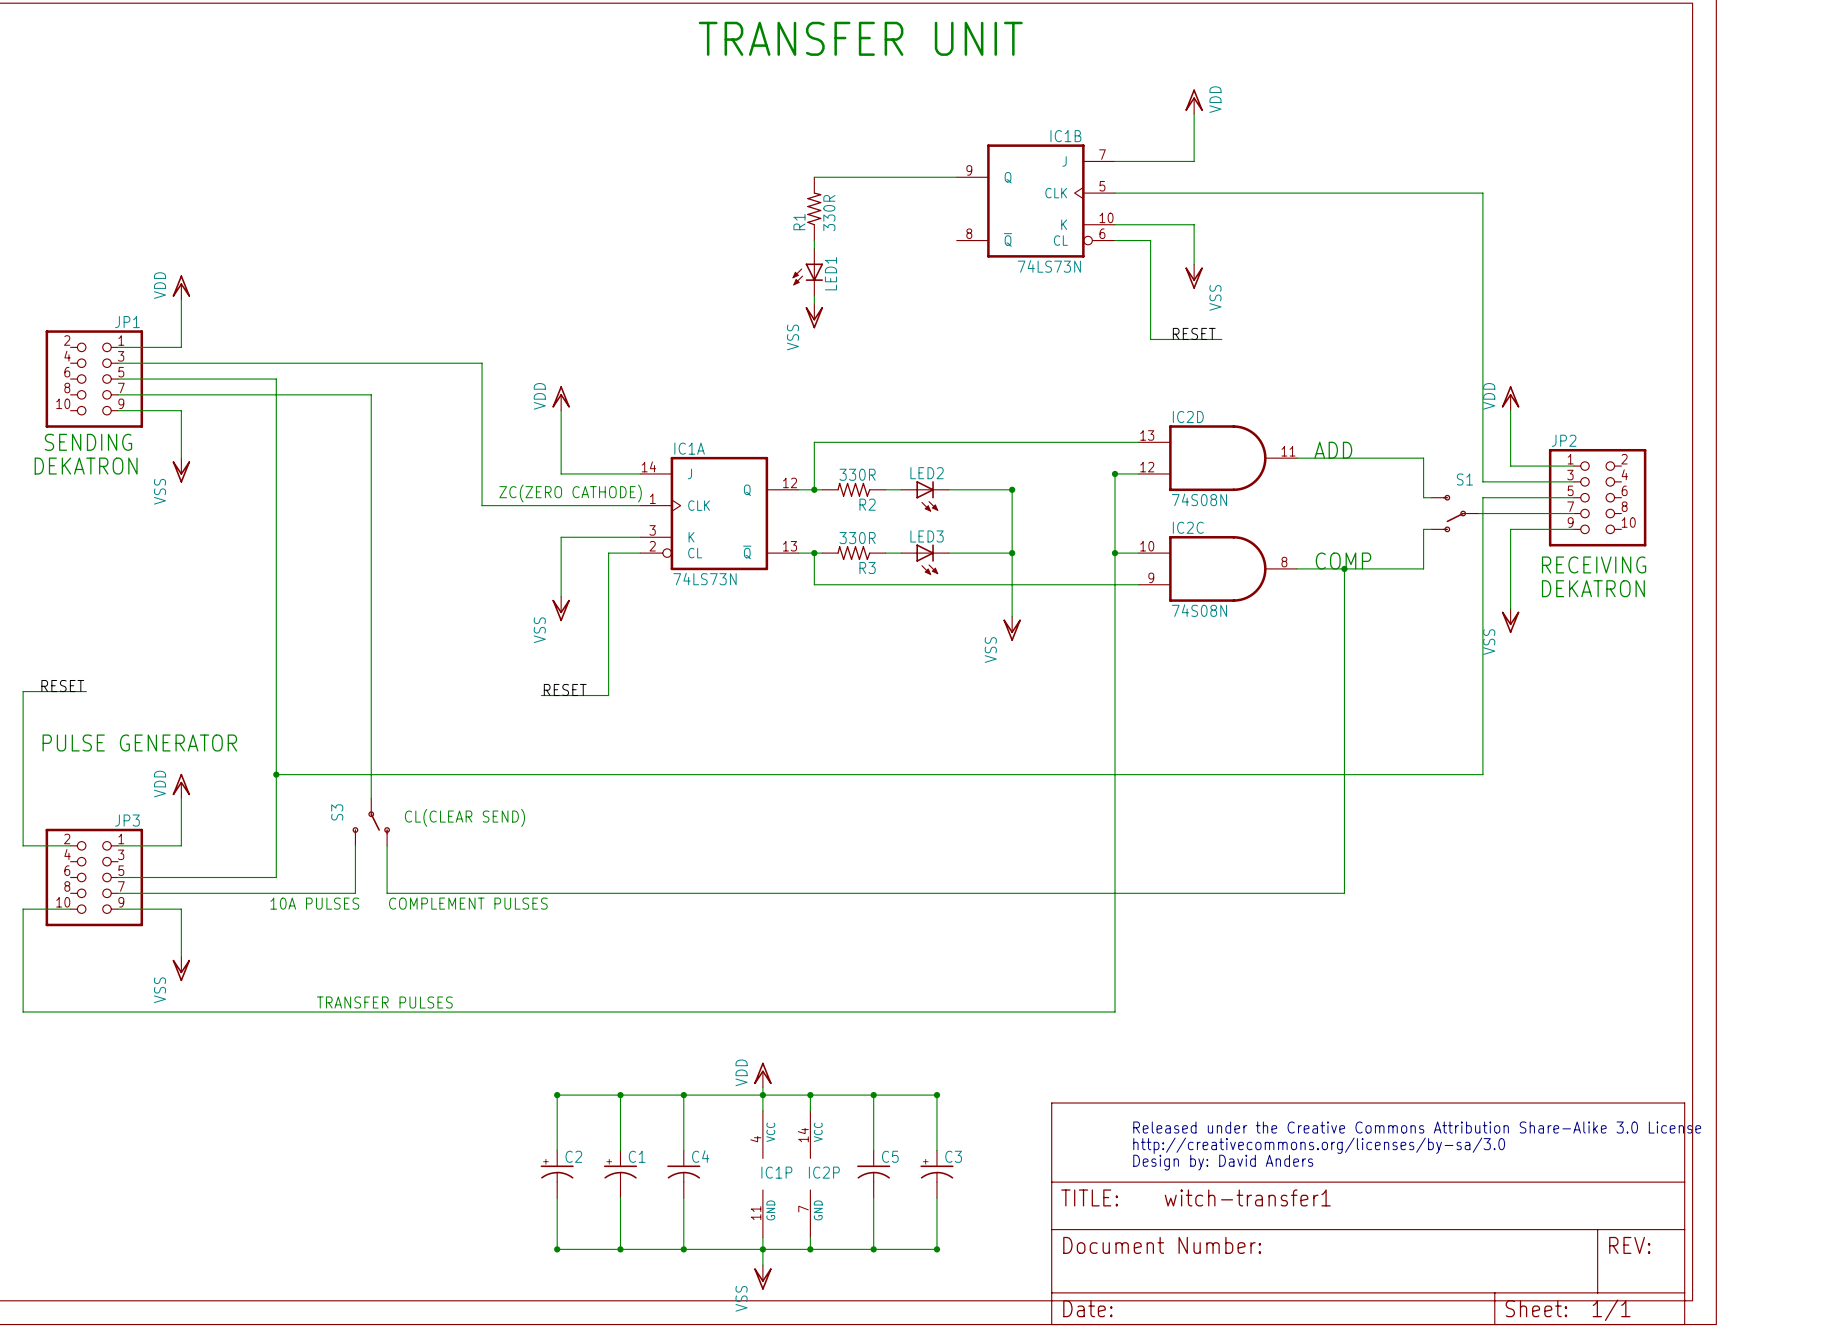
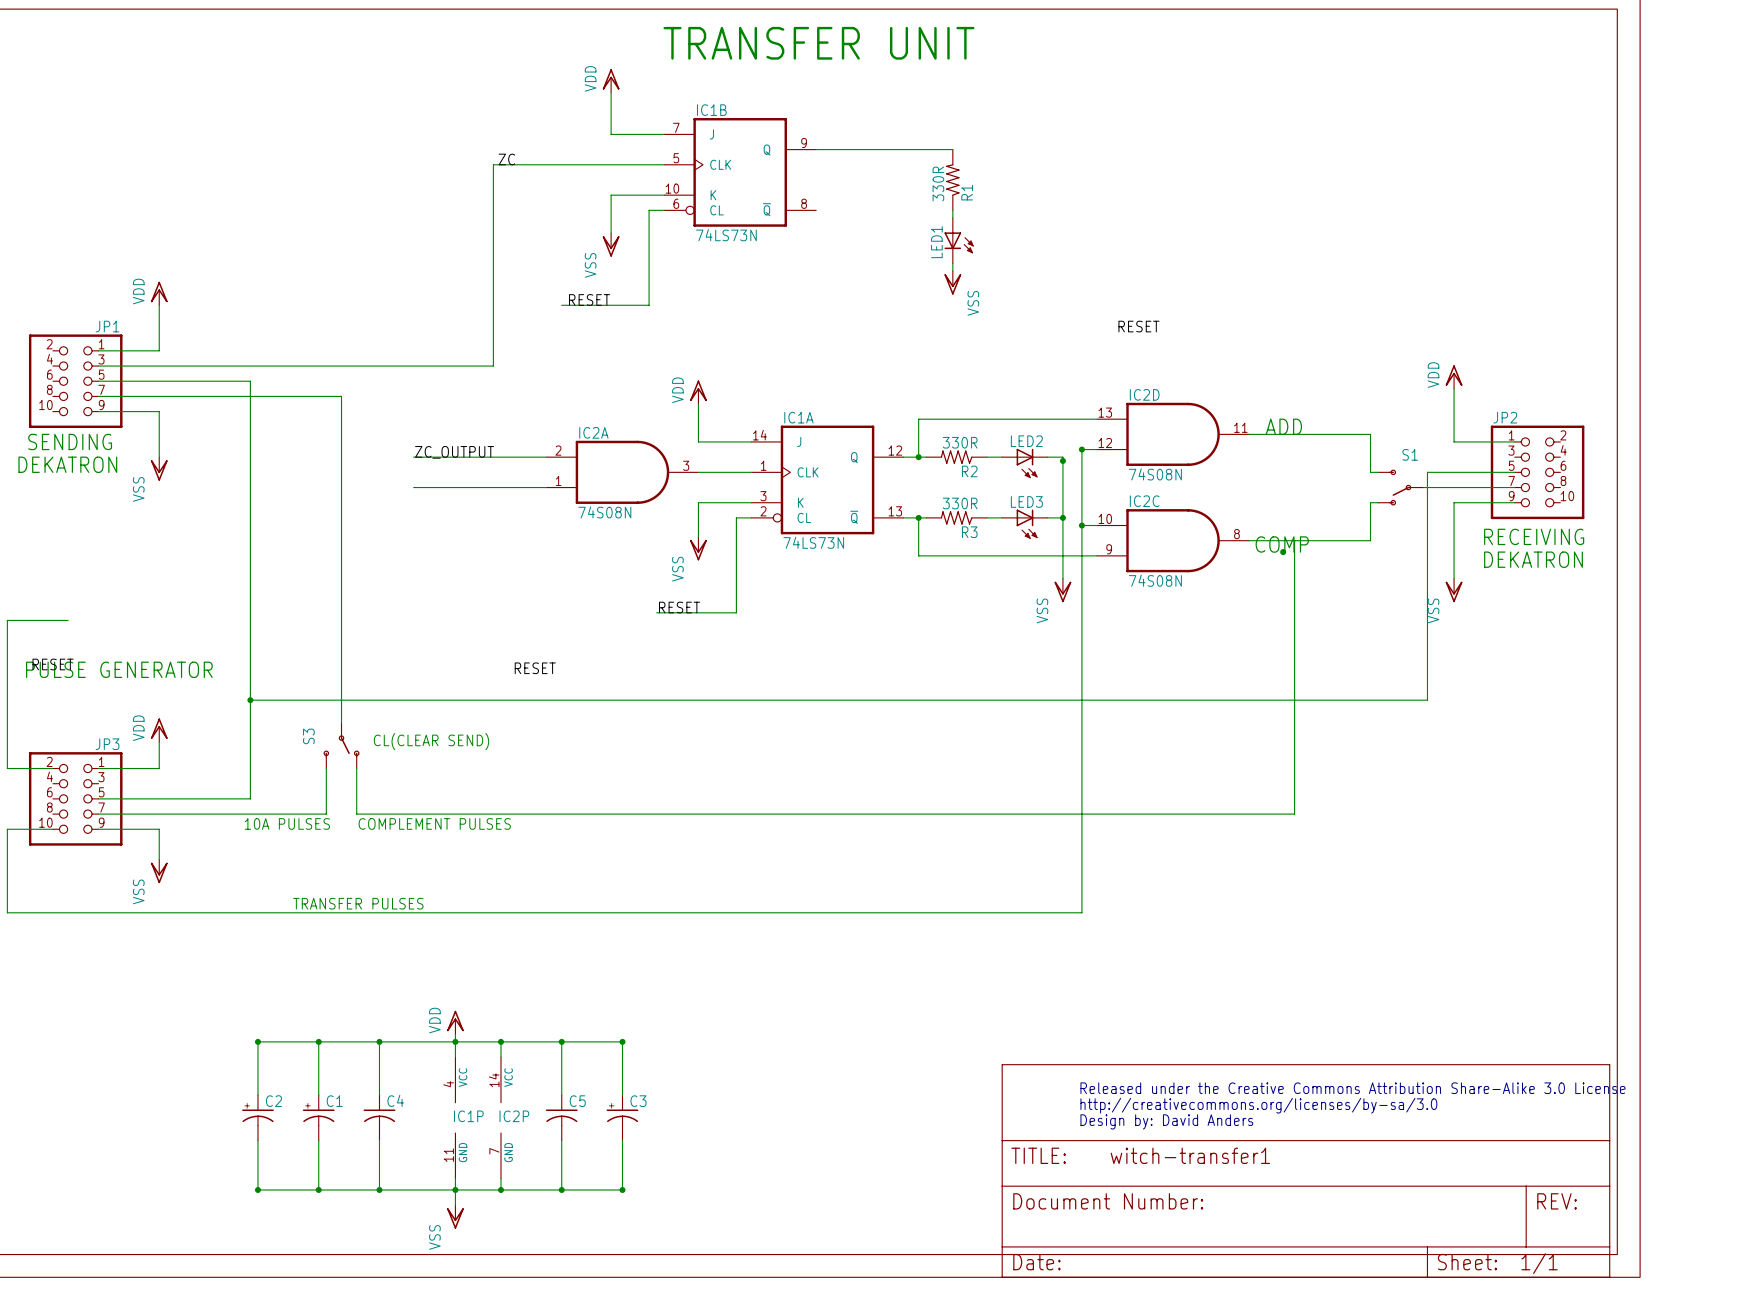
power symbol: none -> VDD (611, 80)
wire: none -> (611, 92) (611, 134) (664, 134)
power symbol: VDD (1194, 101) -> none
wire: (1194, 113) (1194, 161) (1115, 161) -> none
label: none -> ZC (506, 159)
wire: none -> (664, 164) (493, 164) (493, 366) (98, 366)
wire: (814, 177) (956, 177) -> (816, 149) (952, 149)
wire: (1115, 193) (1482, 193) (1482, 481) (1573, 481) -> none
wire: none -> (664, 195) (611, 195) (611, 233)
IC1B flip: as is (1035, 201) -> left-right (740, 172)
IC1B position: (1035, 201) -> (740, 172)
R1 flip: as is (814, 208) -> left-right (952, 179)
R1 position: (814, 208) -> (952, 179)
wire: none -> (664, 210) (649, 210) (649, 305) (561, 305)
wire: none -> (952, 210) (952, 217)
wire: (1115, 224) (1194, 224) (1194, 264) -> none
wire: (814, 240) (814, 248) -> none
wire: (1115, 240) (1150, 240) (1150, 339) (1221, 339) -> none
power symbol: none -> VSS (611, 244)
wire: none -> (952, 263) (952, 271)
LED1 position: (807, 272) -> (959, 240)
LED1 flip: as is (807, 274) -> left-right (959, 242)
power symbol: VSS (1194, 276) -> none
power symbol position: VDD (181, 287) -> VDD (159, 293)
power symbol: none -> VSS (952, 282)
wire: (814, 295) (814, 303) -> none
wire: (181, 299) (181, 347) (118, 347) -> (159, 305) (159, 350) (98, 350)
label: none -> RESET (589, 299)
power symbol: VSS (814, 316) -> none
wire: (118, 363) (482, 363) (482, 505) (640, 505) -> none
JP1 position: (94, 379) -> (75, 381)
wire: (118, 379) (276, 379) (276, 877) (118, 877) -> none
wire: none -> (98, 381) (250, 381) (250, 798) (98, 798)
wire: (118, 394) (371, 394) (371, 798) -> none
power symbol: VDD (561, 398) -> none
power symbol position: VDD (1510, 398) -> VDD (1454, 377)
power symbol: none -> VDD (698, 392)
wire: none -> (98, 396) (341, 396) (341, 722)
wire: (118, 410) (181, 410) (181, 458) -> (98, 411) (159, 411) (159, 457)
wire: (561, 410) (561, 473) (640, 473) -> none
wire: (1510, 410) (1510, 466) (1573, 466) -> (1454, 388) (1454, 441) (1514, 441)
wire: none -> (698, 404) (698, 441) (751, 441)
wire: none -> (1097, 419) (918, 419) (918, 457)
text position: SENDING (88, 442) -> SENDING (70, 441)
wire: (1138, 442) (814, 442) (814, 489) -> none
text position: ADD (1333, 450) -> ADD (1283, 426)
IC2D position: (1217, 458) -> (1173, 434)
wire: (1296, 458) (1423, 458) (1423, 497) (1431, 497) -> (1249, 434) (1370, 434) (1370, 472) (1378, 472)
junction: none -> (1081, 449)
wire: none -> (1097, 449) (1081, 449) (1081, 912) (7, 912) (7, 829) (52, 829)
label: none -> ZC_OUTPUT (454, 452)
text position: DEKATRON (86, 466) -> DEKATRON (67, 464)
power symbol position: VSS (181, 470) -> VSS (159, 468)
wire: none -> (413, 457) (546, 457)
junction: none -> (918, 457)
wire: (1115, 473) (1138, 473) -> (1062, 460) (1062, 457) (1047, 457)
IC2A: none -> 74S08N (622, 472)
wire: none -> (698, 472) (751, 472)
wire: none -> (1514, 472) (1427, 472) (1427, 700) (250, 700)
wire: (798, 489) (822, 489) -> (903, 457) (926, 457)
junction: (814, 489) -> none
R2 position: (853, 489) -> (956, 457)
wire: (885, 489) (901, 489) -> (987, 457) (1002, 457)
wire: (948, 489) (1012, 489) (1012, 616) -> none
junction: (1012, 489) -> none
text: ZC(ZERO CATHODE) (570, 493) -> none
LED2 position: (925, 496) -> (1024, 463)
wire: (1573, 497) (1482, 497) (1482, 774) (276, 774) -> none
JP2 position: (1597, 497) -> (1537, 472)
wire: none -> (413, 487) (546, 487)
IC1A position: (719, 513) -> (827, 479)
S1 position: (1455, 513) -> (1400, 487)
wire: (1478, 513) (1573, 513) -> (1423, 487) (1514, 487)
wire: none -> (751, 502) (698, 502) (698, 536)
wire: (1431, 529) (1423, 529) (1423, 568) (1296, 568) -> (1378, 502) (1370, 502) (1370, 540) (1249, 540)
wire: (1573, 529) (1510, 529) (1510, 608) -> (1514, 502) (1454, 502) (1454, 578)
wire: none -> (751, 517) (736, 517) (736, 612) (656, 612)
wire: none -> (918, 517) (918, 555) (1097, 555)
junction: none -> (918, 517)
wire: none -> (1047, 517) (1062, 517)
junction: none -> (1062, 517)
wire: (640, 537) (561, 537) (561, 596) -> none
wire: none -> (1081, 525) (1097, 525)
junction: none -> (1081, 525)
wire: (640, 553) (608, 553) (608, 695) (541, 695) -> none
wire: (798, 553) (822, 553) -> (903, 517) (926, 517)
wire: (814, 553) (814, 584) (1138, 584) -> none
junction: (814, 553) -> none
R3 position: (853, 553) -> (956, 517)
wire: (885, 553) (901, 553) -> (987, 517) (1002, 517)
wire: (948, 553) (1012, 553) -> none
junction: (1012, 553) -> none
wire: (1115, 553) (1138, 553) -> none
junction: (1115, 553) -> none
wire: none -> (1294, 540) (1294, 814) (356, 814) (356, 768)
LED3 position: (925, 559) -> (1024, 524)
text position: RECEIVING (1594, 564) -> RECEIVING (1534, 536)
power symbol: none -> VSS (698, 548)
IC2C position: (1217, 568) -> (1173, 540)
wire: (1344, 568) (1344, 893) (387, 893) (387, 845) -> none
text position: DEKATRON (1593, 588) -> DEKATRON (1533, 559)
wire: (1115, 596) (1115, 1012) (23, 1012) (23, 909) (70, 909) -> none
power symbol: VSS (561, 608) -> none
power symbol position: VSS (1510, 620) -> VSS (1454, 590)
label: none -> RESET (679, 607)
power symbol position: VSS (1012, 628) -> VSS (1062, 590)
wire: (86, 691) (23, 691) (23, 845) (70, 845) -> (68, 620) (7, 620) (7, 768) (52, 768)
junction: none -> (250, 700)
text position: PULSE GENERATOR (139, 742) -> PULSE GENERATOR (119, 669)
wire: none -> (159, 741) (159, 768) (98, 768)
junction: (276, 774) -> none
power symbol position: VDD (181, 786) -> VDD (159, 730)
wire: (181, 798) (181, 845) (118, 845) -> none
text position: CL(CLEAR SEND) (464, 817) -> CL(CLEAR SEND) (431, 741)
S3 position: (371, 822) -> (341, 745)
wire: (355, 845) (355, 893) (118, 893) -> (326, 768) (326, 814) (98, 814)
wire: none -> (98, 829) (159, 829) (159, 859)
JP3 position: (94, 877) -> (75, 798)
text position: 10A PULSES (314, 903) -> 10A PULSES (287, 823)
text position: COMPLEMENT PULSES (468, 903) -> COMPLEMENT PULSES (434, 823)
wire: (118, 909) (181, 909) (181, 956) -> none
power symbol position: VSS (181, 968) -> VSS (159, 871)
text position: TRANSFER PULSES (384, 1002) -> TRANSFER PULSES (358, 903)
power symbol: none -> VDD (455, 1022)
wire: none -> (455, 1034) (455, 1057)
power symbol: VDD (762, 1074) -> none
junction: none -> (257, 1041)
wire: none -> (318, 1041) (318, 1095)
junction: none -> (318, 1041)
wire: none -> (379, 1041) (379, 1095)
junction: none -> (379, 1041)
junction: none -> (455, 1041)
wire: none -> (500, 1041) (500, 1057)
junction: none -> (500, 1041)
junction: none -> (561, 1041)
junction: none -> (622, 1041)
wire: (762, 1087) (762, 1110) -> none
junction: (557, 1095) -> none
wire: (620, 1095) (620, 1150) -> (561, 1041) (561, 1095)
junction: (620, 1095) -> none
wire: (683, 1095) (683, 1150) -> none
junction: (683, 1095) -> none
junction: (762, 1095) -> none
wire: (810, 1095) (810, 1110) -> none
junction: (810, 1095) -> none
wire: (873, 1095) (873, 1150) -> none
junction: (873, 1095) -> none
junction: (936, 1095) -> none
wire: none -> (257, 1095) (257, 1041) (622, 1041) (622, 1095)
wire: (557, 1150) (557, 1095) (936, 1095) (936, 1150) -> none
C2 position: (557, 1174) -> (257, 1117)
C1 position: (620, 1174) -> (318, 1117)
C4 position: (683, 1174) -> (379, 1117)
IC1P position: (762, 1174) -> (455, 1117)
IC2P position: (810, 1174) -> (500, 1117)
C5 position: (873, 1174) -> (561, 1117)
C3 position: (936, 1174) -> (622, 1117)
wire: none -> (257, 1140) (257, 1189) (622, 1189) (622, 1140)
wire: none -> (318, 1140) (318, 1189)
wire: none -> (379, 1140) (379, 1189)
wire: (557, 1197) (557, 1249) (936, 1249) (936, 1197) -> none
wire: (620, 1197) (620, 1249) -> (561, 1140) (561, 1189)
wire: (683, 1197) (683, 1249) -> none
wire: (873, 1197) (873, 1249) -> none
wire: none -> (455, 1178) (455, 1205)
wire: none -> (500, 1178) (500, 1189)
junction: none -> (257, 1189)
junction: none -> (318, 1189)
junction: none -> (379, 1189)
junction: none -> (455, 1189)
junction: none -> (500, 1189)
junction: none -> (561, 1189)
junction: none -> (622, 1189)
wire: (762, 1237) (762, 1265) -> none
wire: (810, 1237) (810, 1249) -> none
junction: (557, 1249) -> none
junction: (620, 1249) -> none
junction: (683, 1249) -> none
junction: (762, 1249) -> none
junction: (810, 1249) -> none
junction: (873, 1249) -> none
junction: (936, 1249) -> none
power symbol: none -> VSS (455, 1216)
power symbol: VSS (762, 1277) -> none

